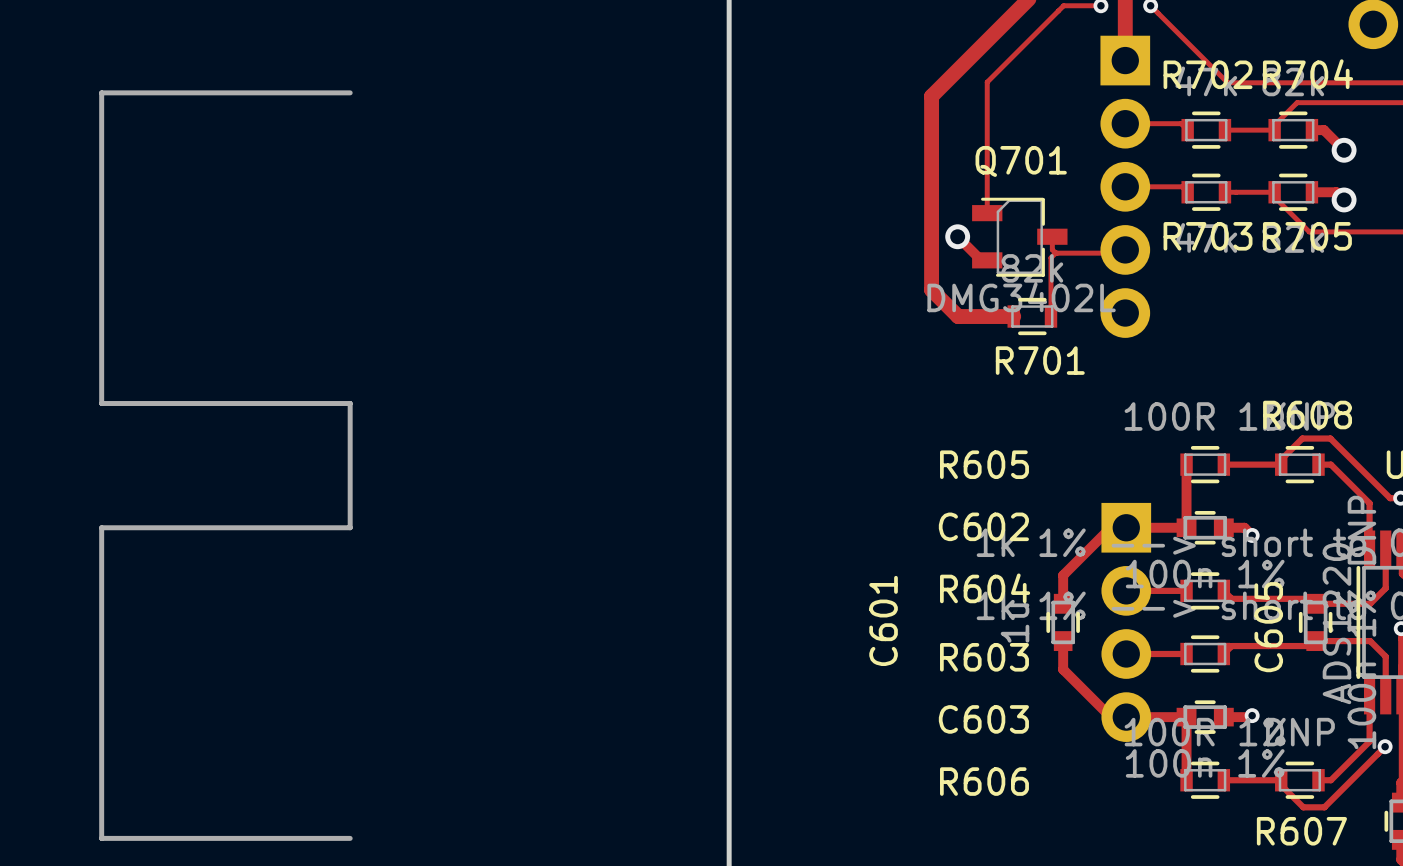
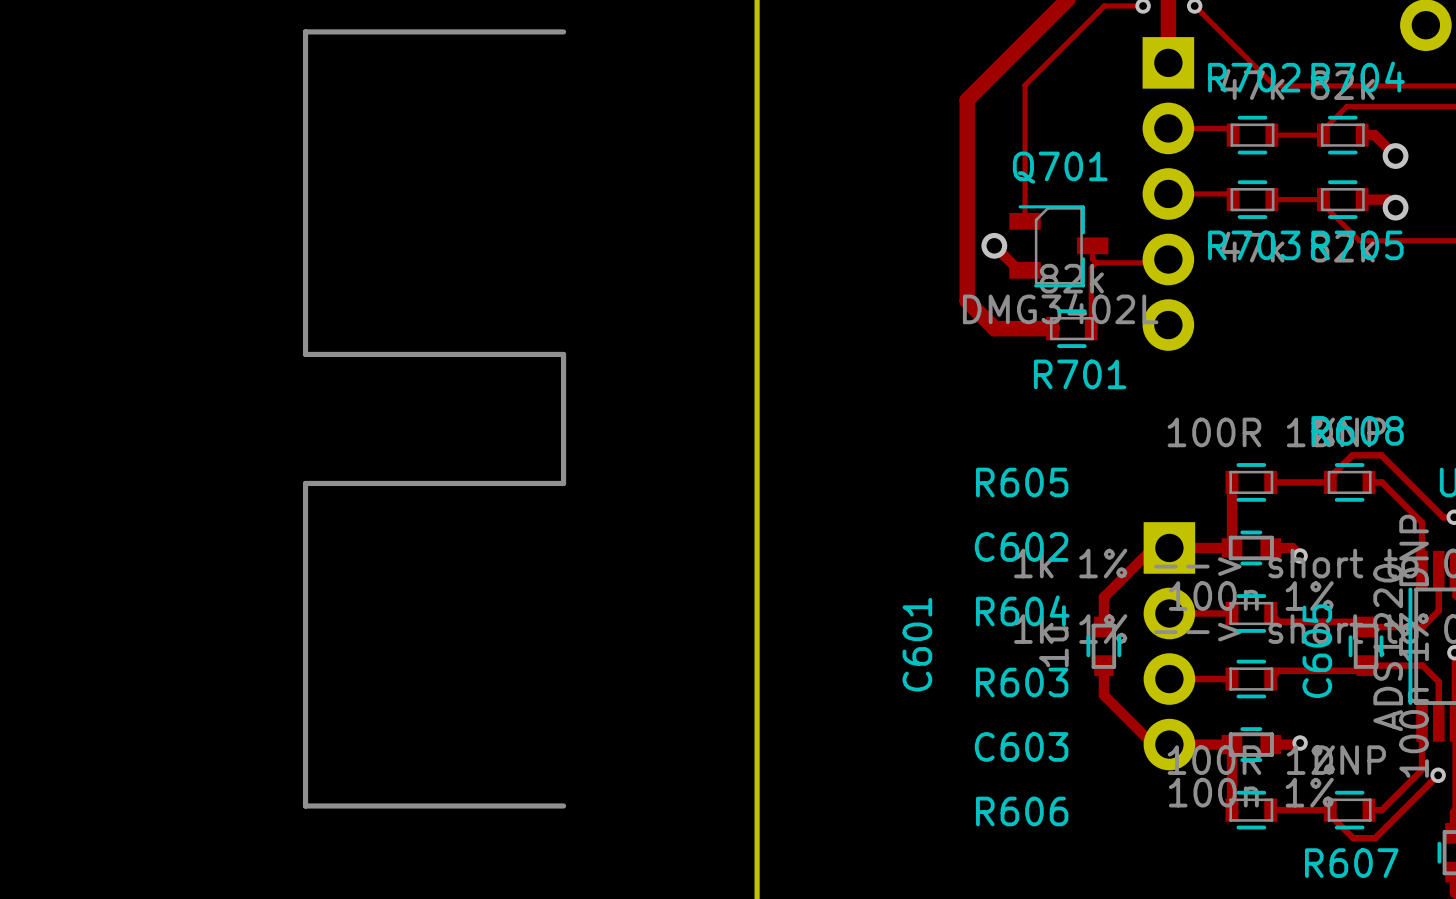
line: (350, 92) (101, 92) (101, 403) (350, 403) (350, 527) (101, 527) (101, 838) (350, 838) -> (563, 31) (305, 31) (305, 354) (563, 354) (563, 483) (305, 483) (305, 805) (563, 805)

